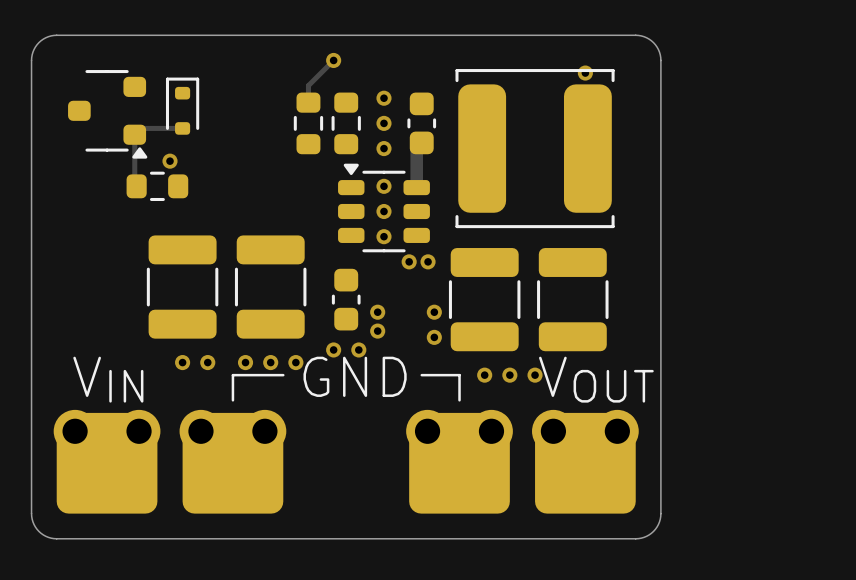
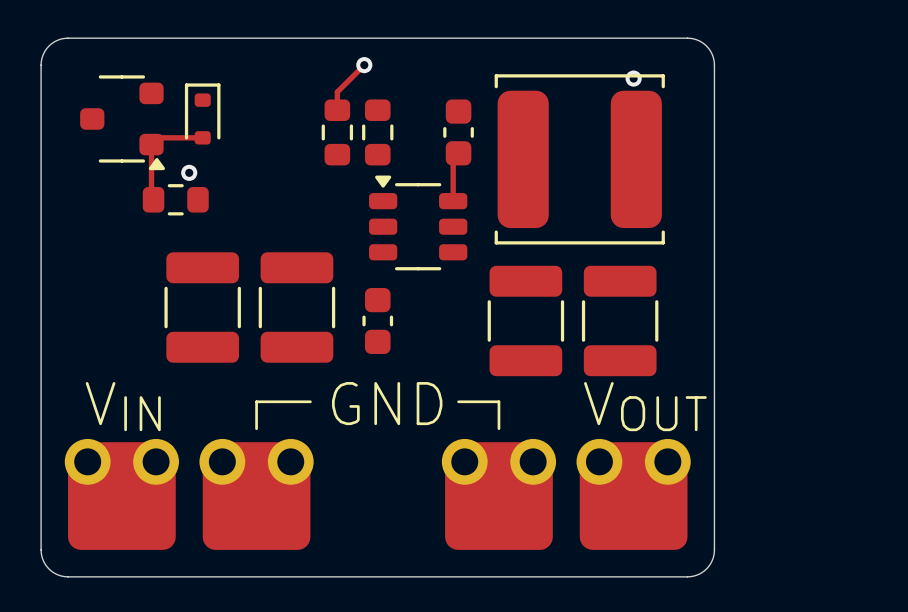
via: (383, 98) -> none
via: (383, 123) -> none
track width: thick (421, 142) (416, 147) (416, 187) -> thin (458, 153) (453, 158) (453, 201)
via: (383, 148) -> none
via: (383, 186) -> none
via: (383, 211) -> none
via: (383, 236) -> none
via: (409, 261) -> none
via: (428, 261) -> none
via: (377, 312) -> none
via: (434, 312) -> none
via: (377, 331) -> none
via: (434, 337) -> none
via: (333, 349) -> none
via: (358, 349) -> none
via: (182, 362) -> none
via: (207, 362) -> none
via: (245, 362) -> none
via: (270, 362) -> none
via: (295, 362) -> none
via: (484, 375) -> none
via: (509, 375) -> none
via: (535, 375) -> none

